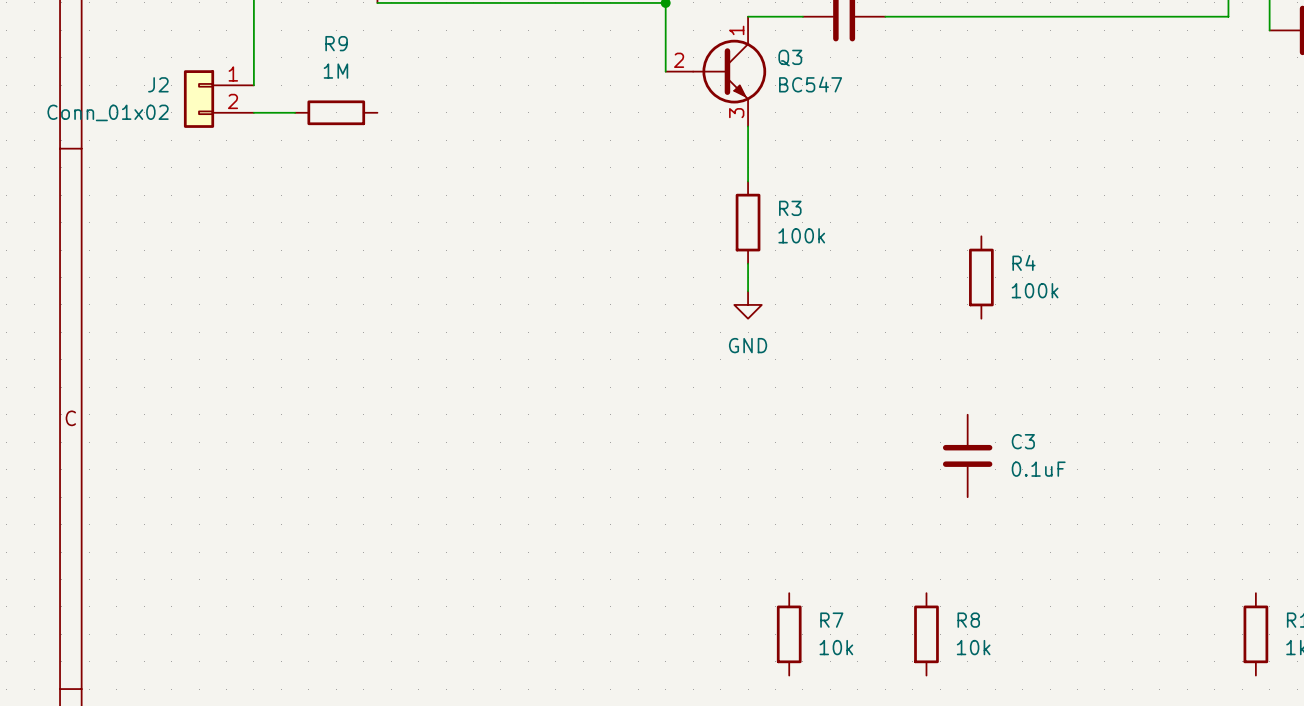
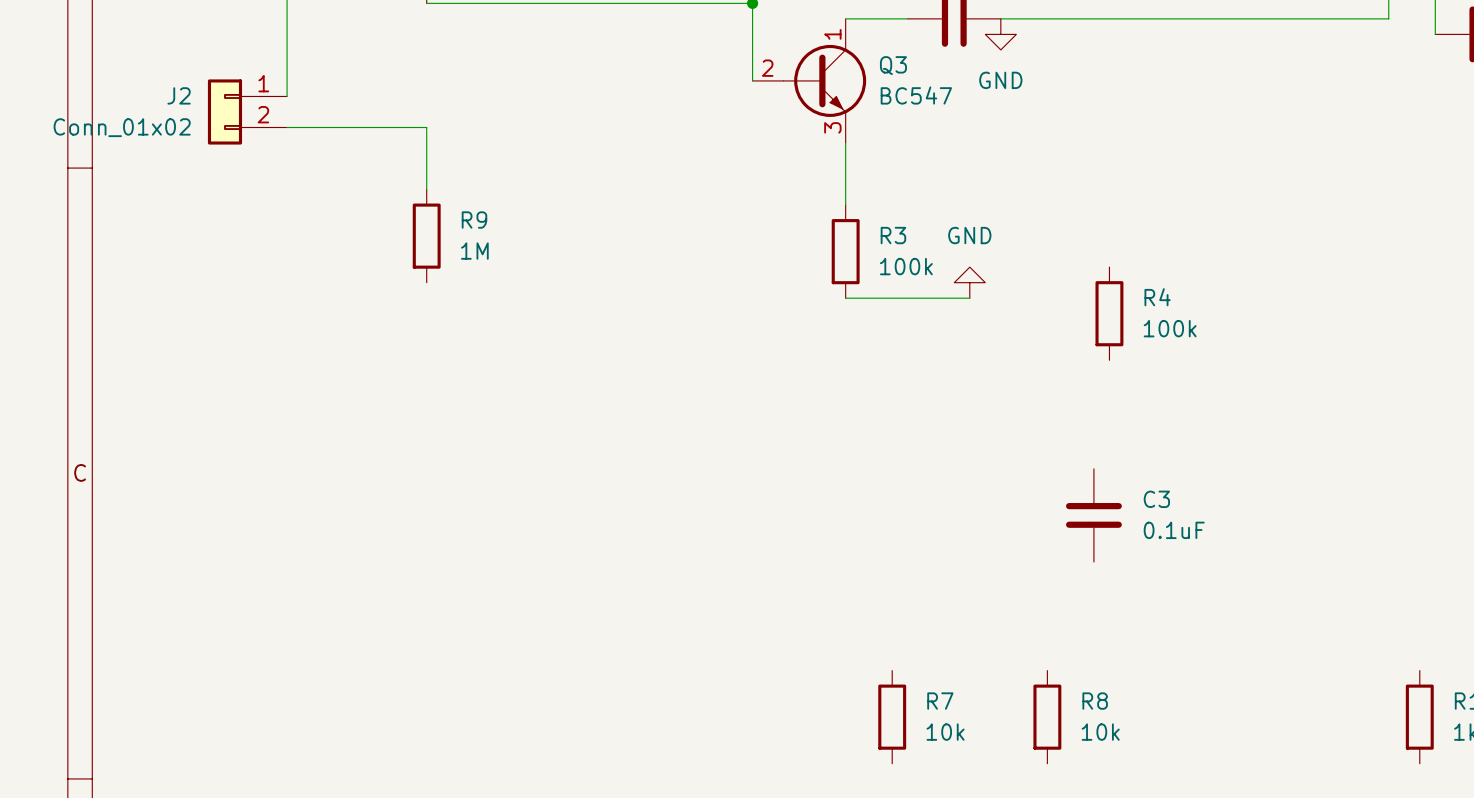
power symbol: none -> GND (1000, 34)
R9 name position: R9 (336, 43) -> R9 (474, 220)
wire: none -> (333, 127) (426, 127) (426, 189)
R9 rotation: 0° (336, 112) -> 90° clockwise (426, 236)
R9 position: (336, 112) -> (426, 236)
wire: (748, 263) (748, 291) -> (845, 298) (969, 298)
power symbol rotation: 0° (748, 304) -> 180° (969, 282)
power symbol position: GND (748, 304) -> GND (969, 282)

